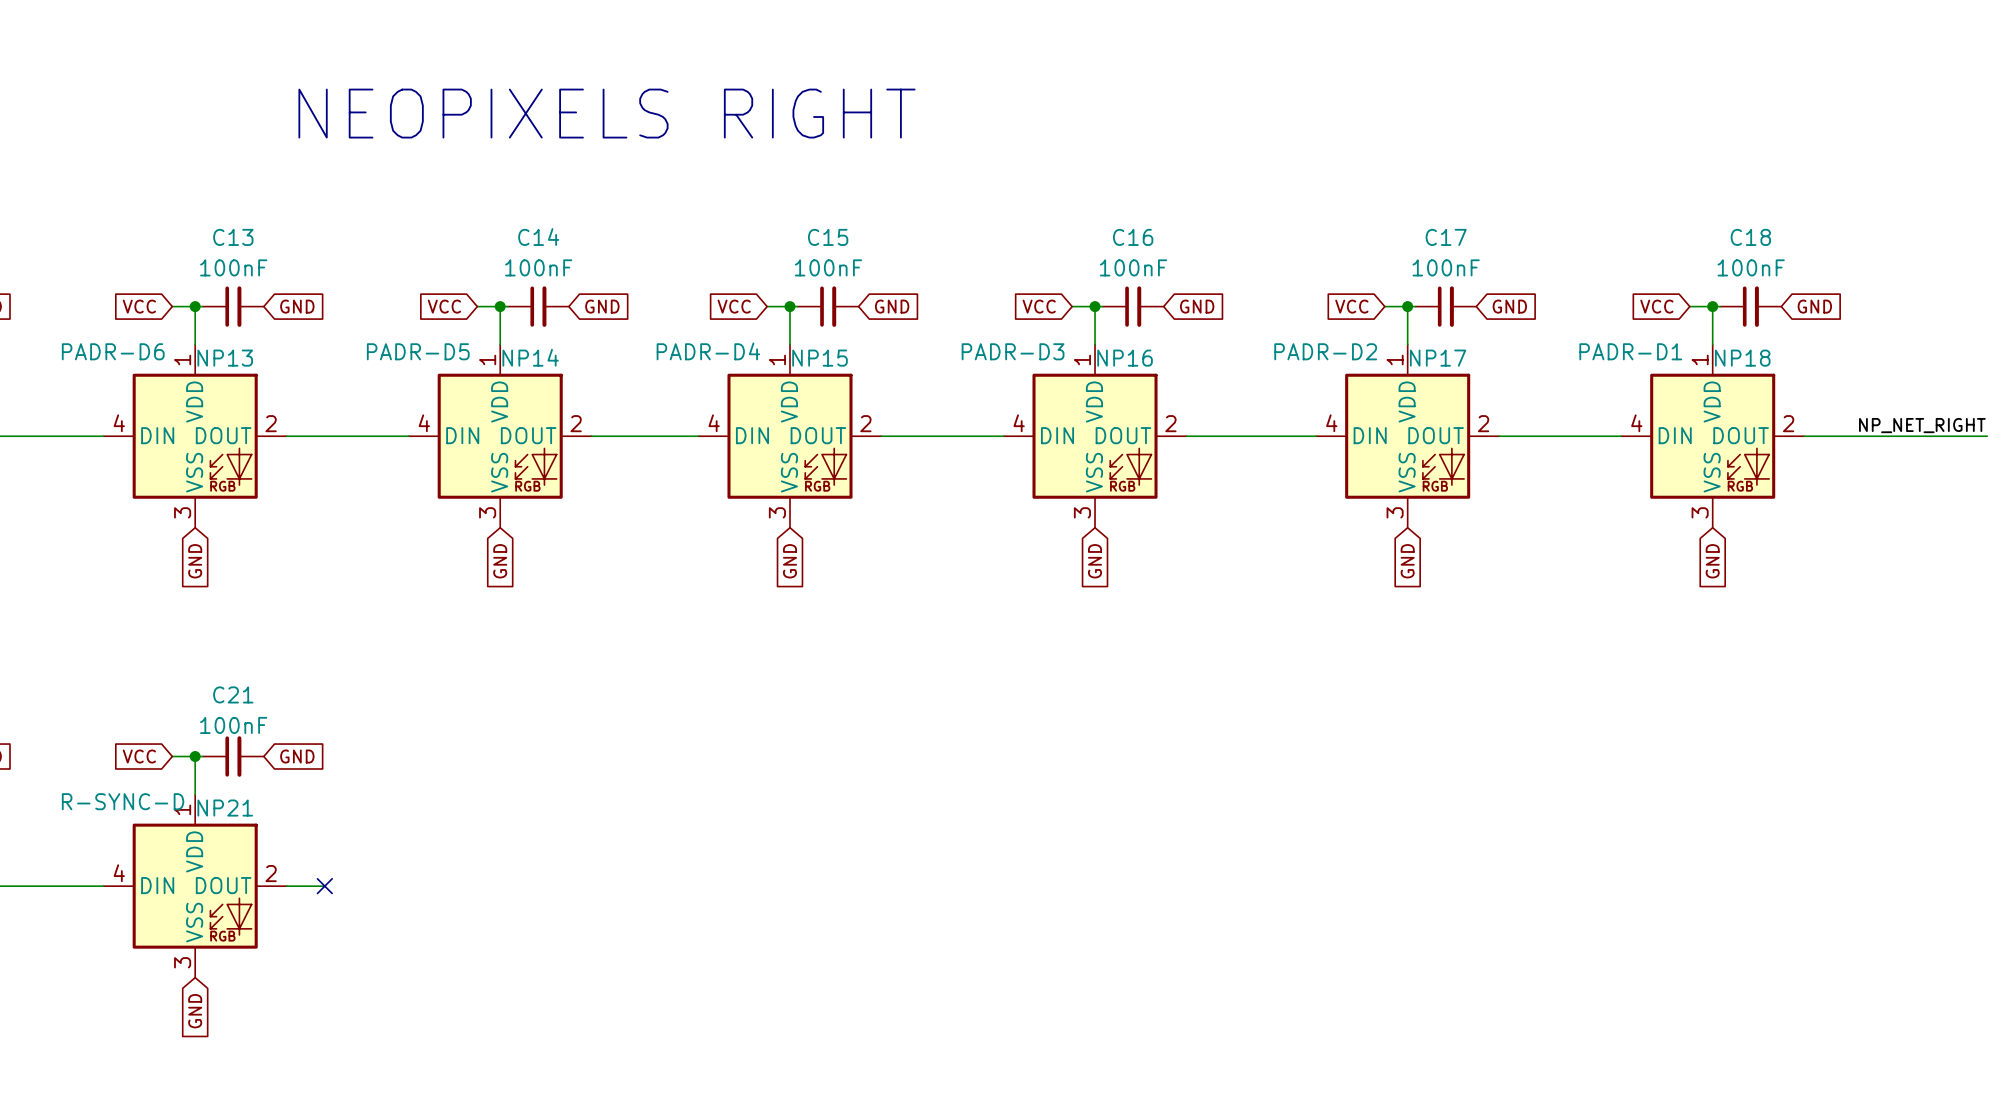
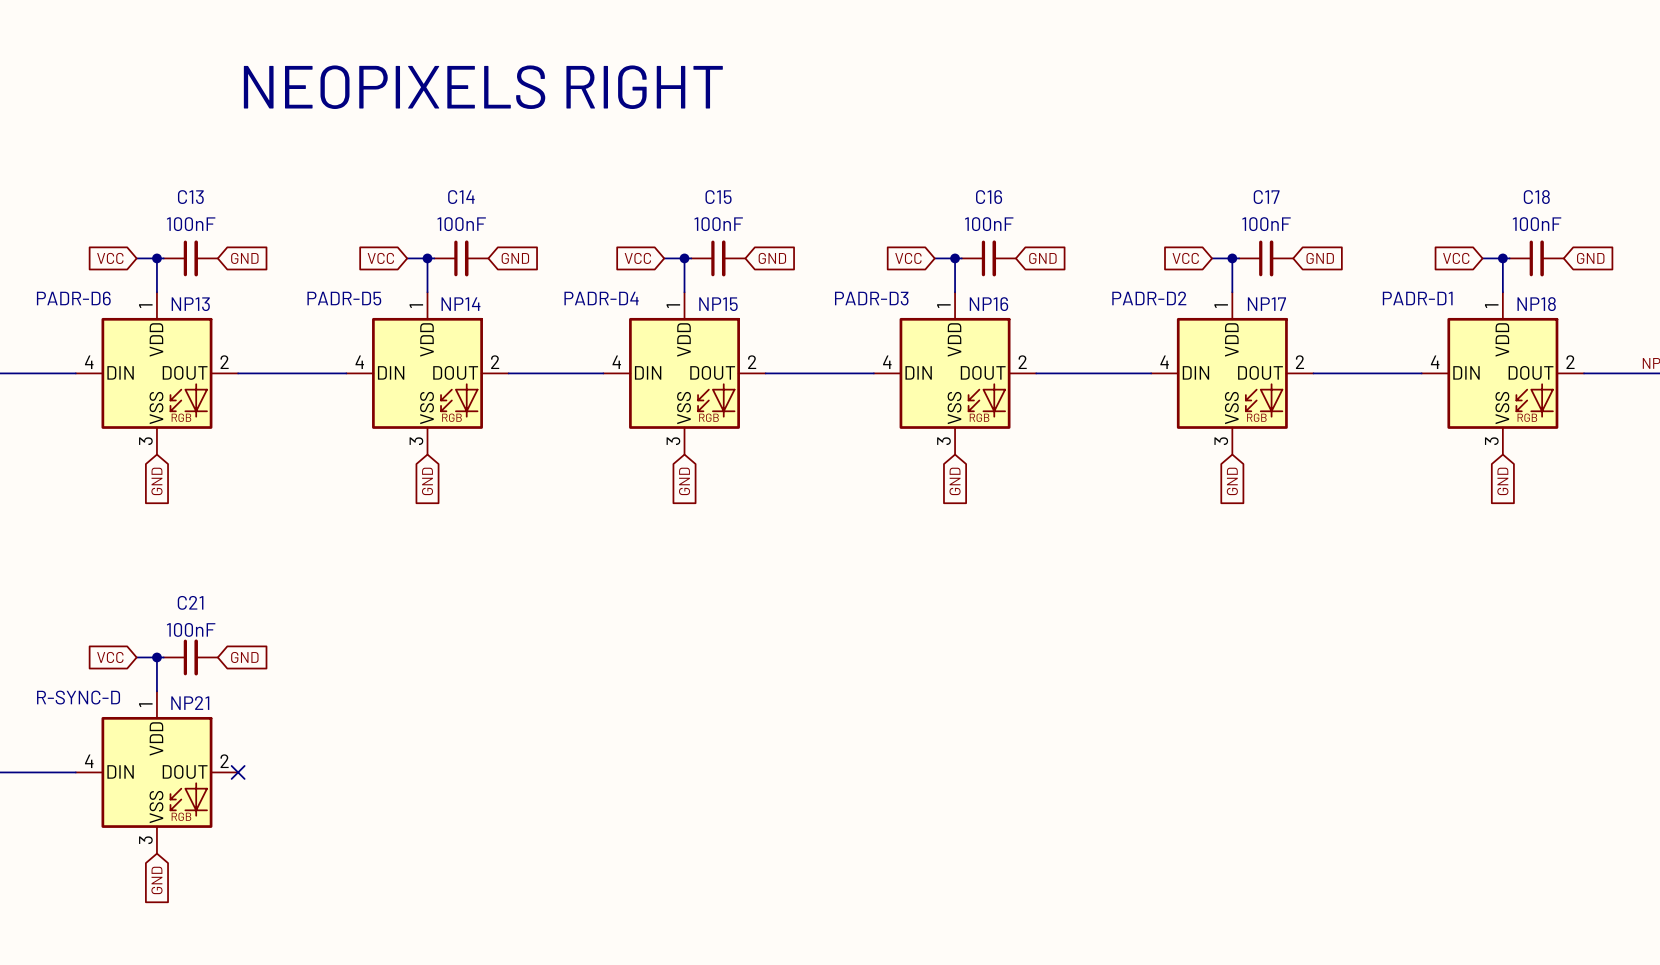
wire: (286, 886) (324, 886) -> none
no-connect mark position: (324, 886) -> (238, 772)

